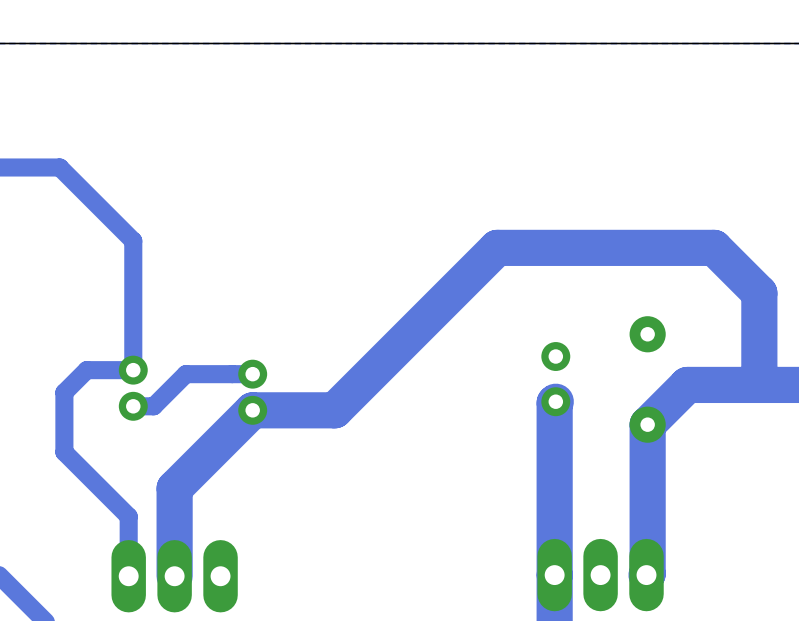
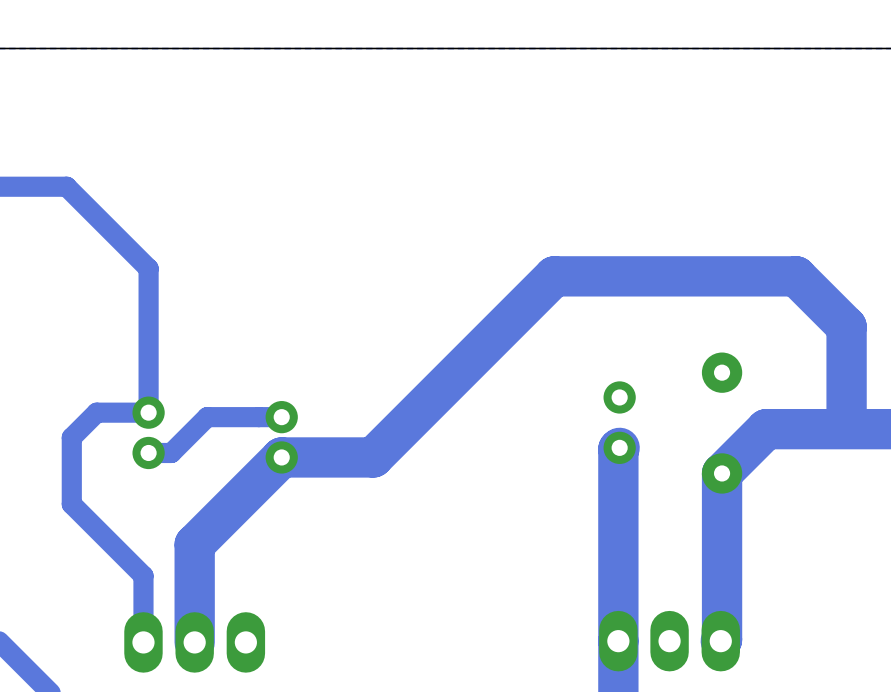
part footprint: [537, 538, 664, 612] -> [599, 610, 740, 672]
part footprint: [111, 540, 238, 613] -> [124, 612, 266, 673]

